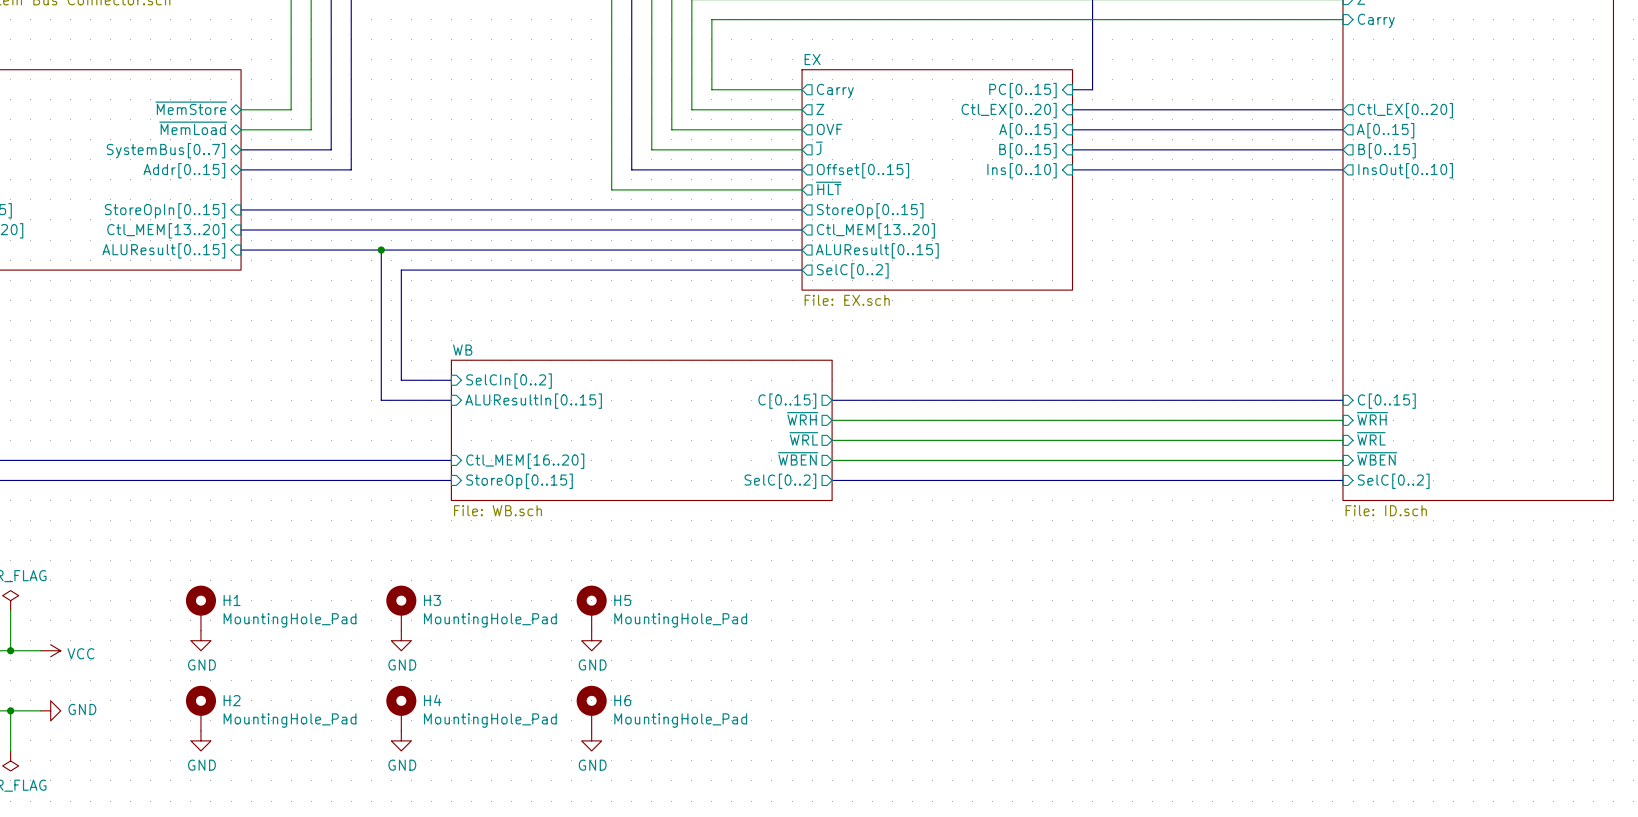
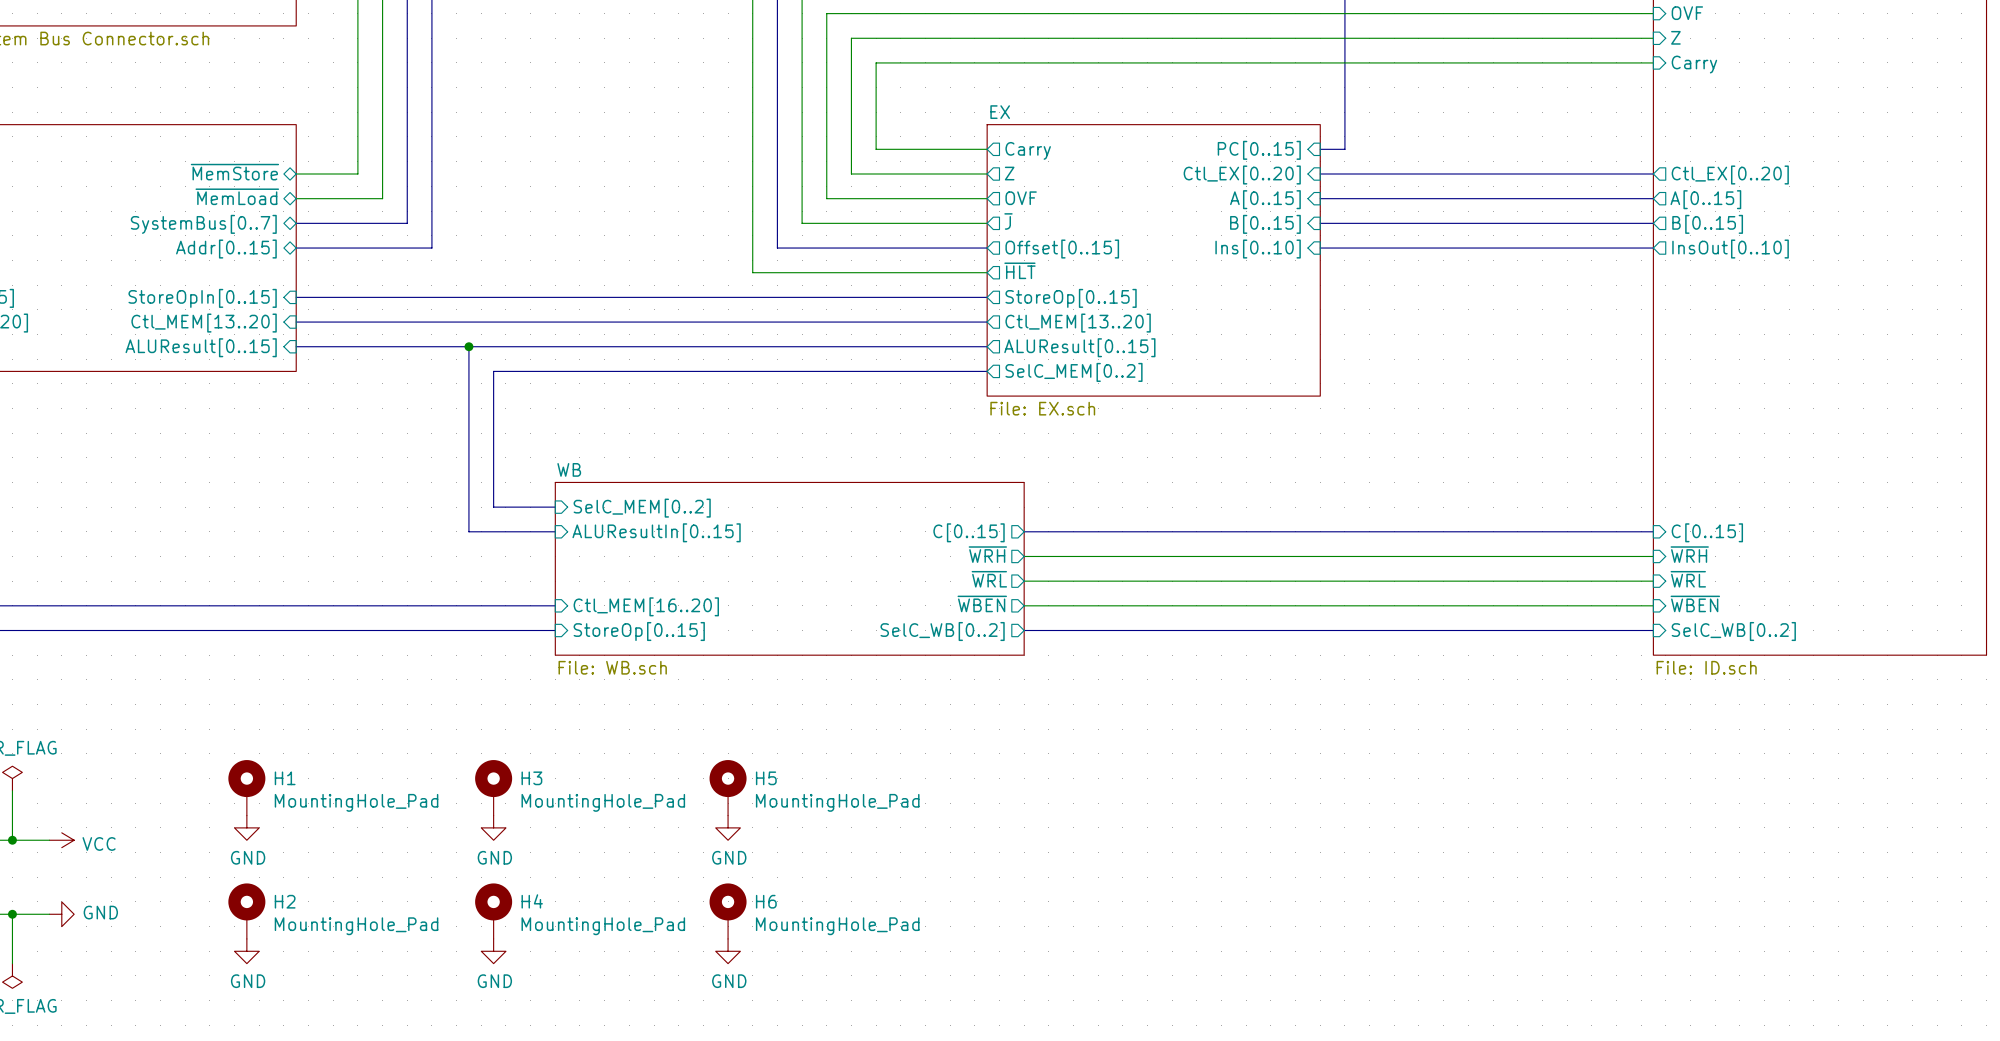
sheet pin: SelC[0..2] (852, 270) -> SelC_MEM[0..2] (1074, 372)
sheet pin: SelCIn[0..2] (509, 381) -> SelC_MEM[0..2] (642, 508)
sheet pin: SelC[0..2] (780, 481) -> SelC_WB[0..2] (942, 631)
sheet pin: SelC[0..2] (1393, 481) -> SelC_WB[0..2] (1733, 631)

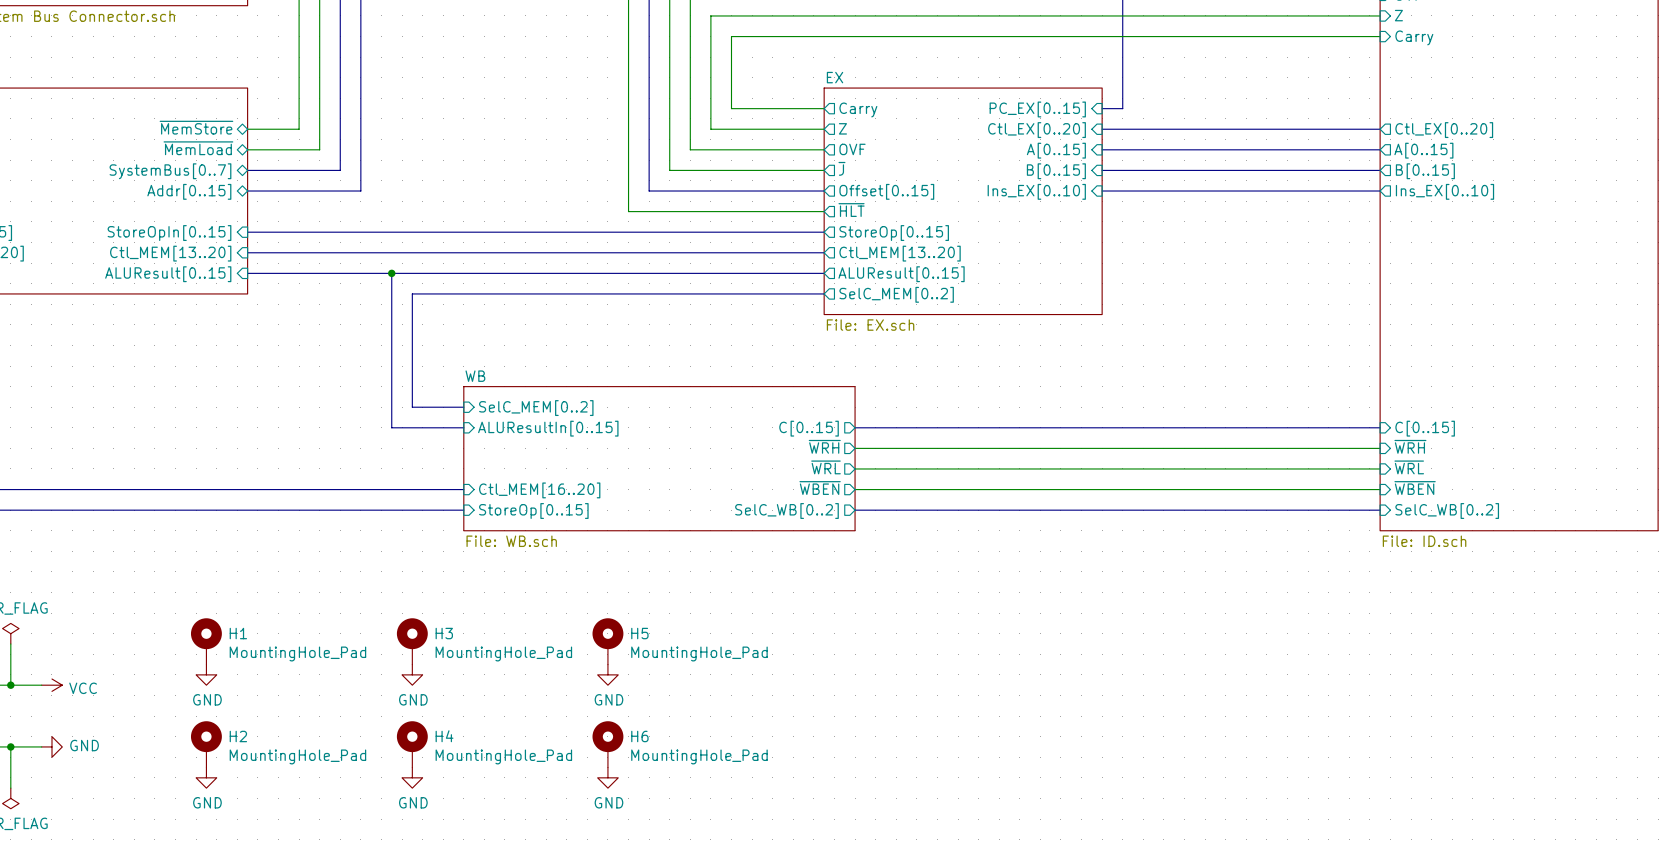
sheet pin: PC[0..15] (1259, 150) -> PC_EX[0..15] (1037, 109)
sheet pin: Ins[0..10] (1258, 249) -> Ins_EX[0..10] (1036, 191)
sheet pin: InsOut[0..10] (1730, 249) -> Ins_EX[0..10] (1444, 191)

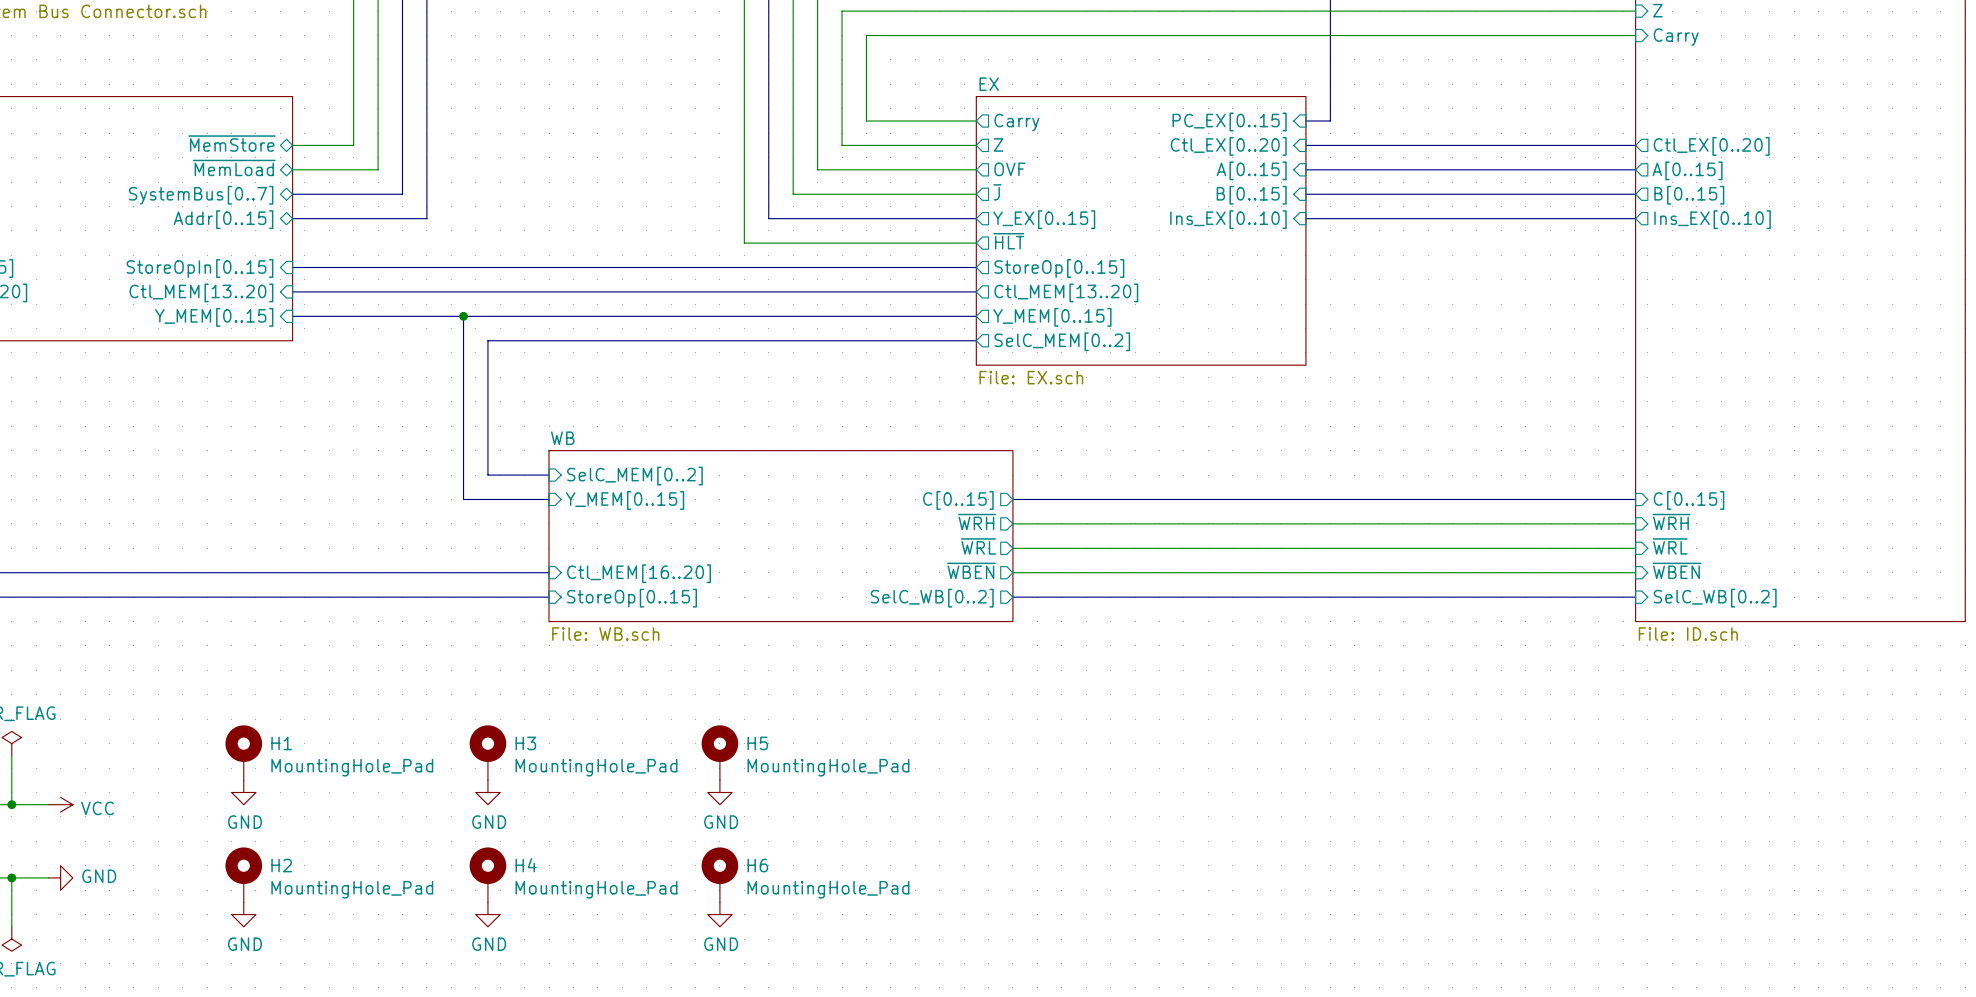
sheet pin: Offset[0..15] (886, 191) -> Y_EX[0..15] (1044, 219)
sheet pin: ALUResult[0..15] (168, 274) -> Y_MEM[0..15] (214, 317)
sheet pin: ALUResult[0..15] (901, 274) -> Y_MEM[0..15] (1052, 317)
sheet pin: ALUResultIn[0..15] (548, 428) -> Y_MEM[0..15] (625, 500)

